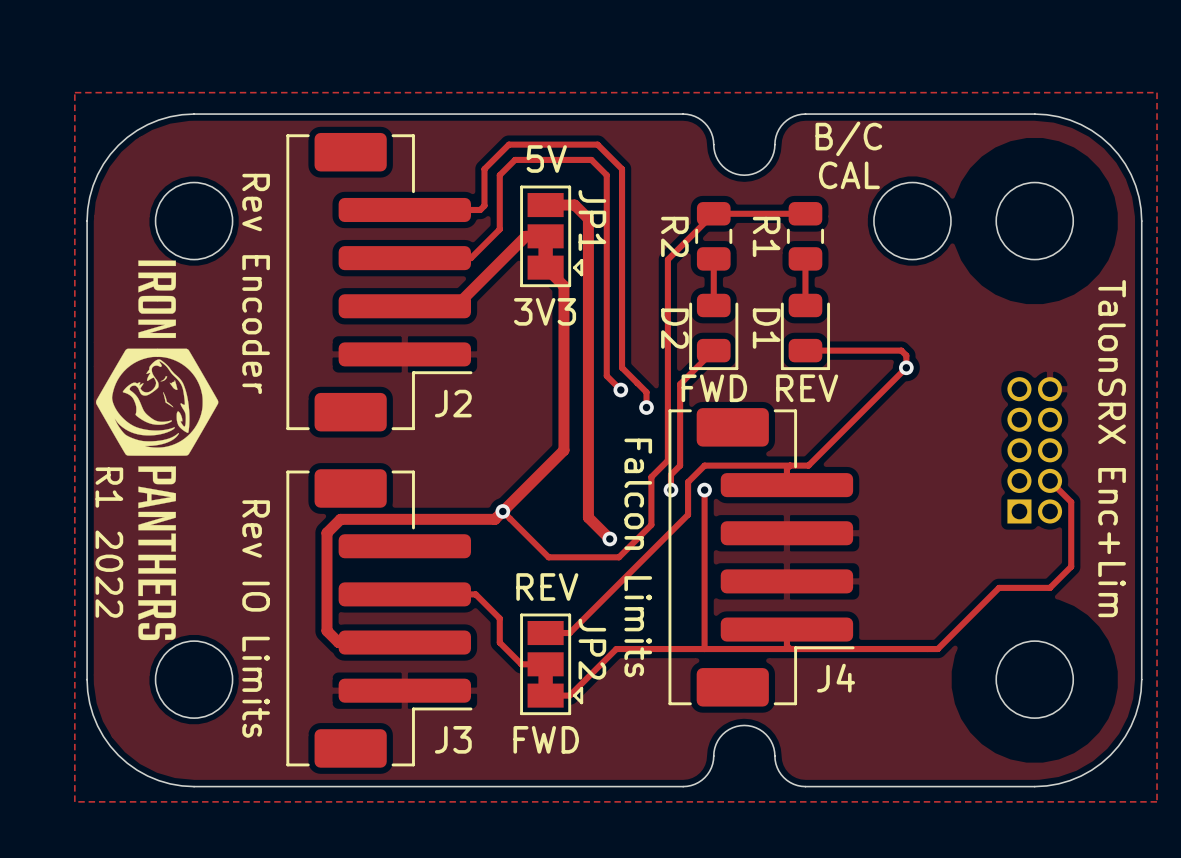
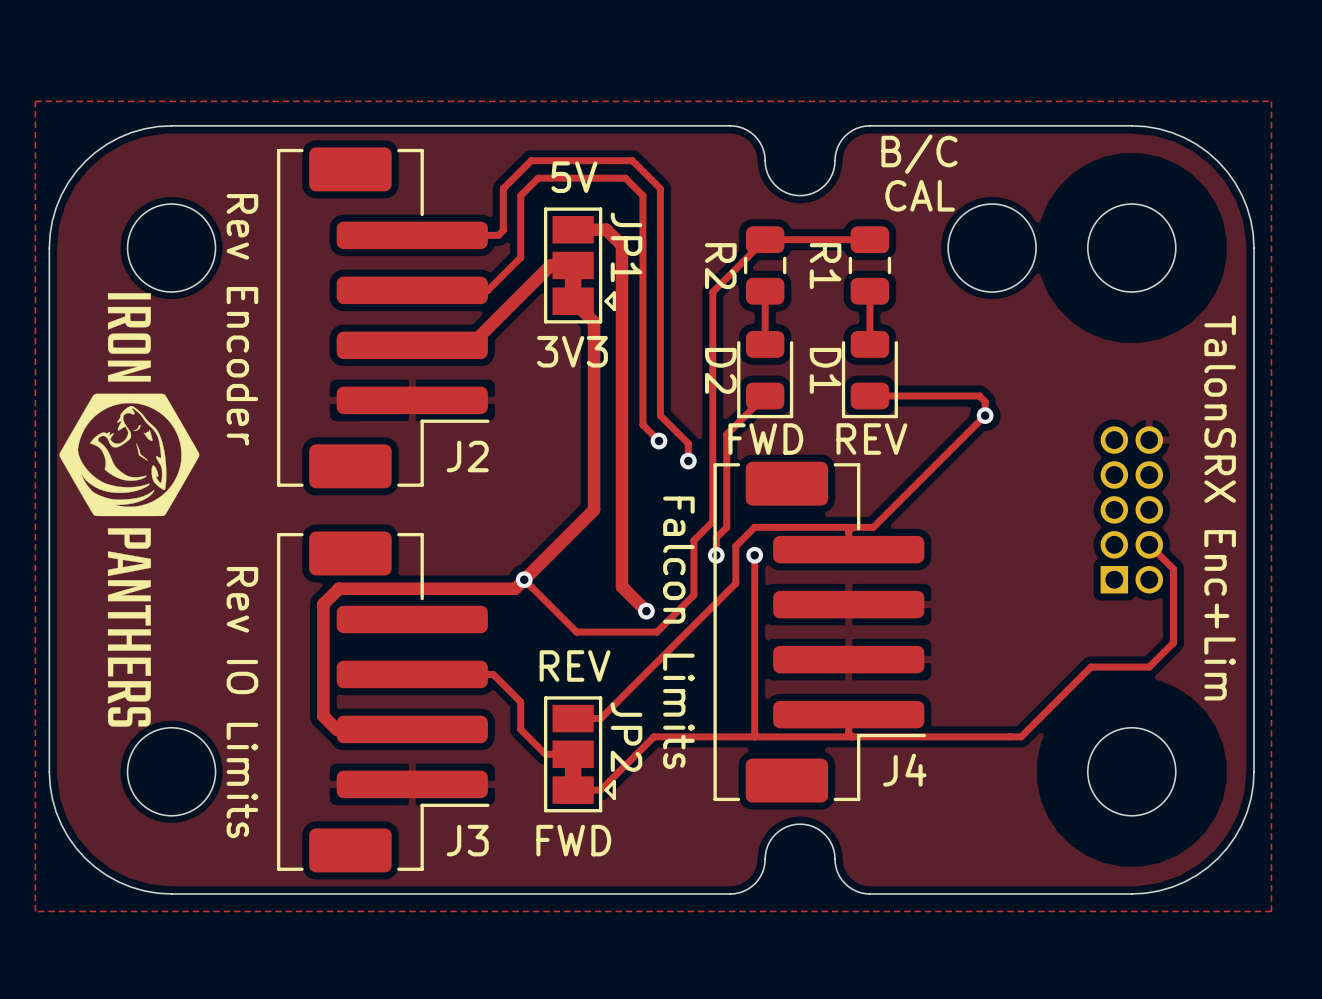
text: R1 2022 (109, 542) -> none

